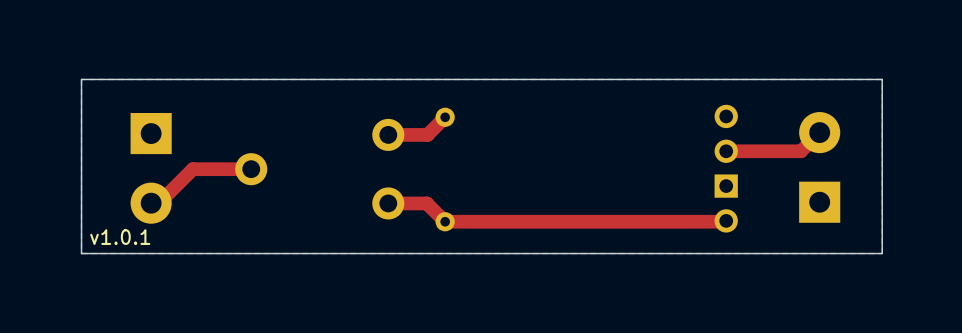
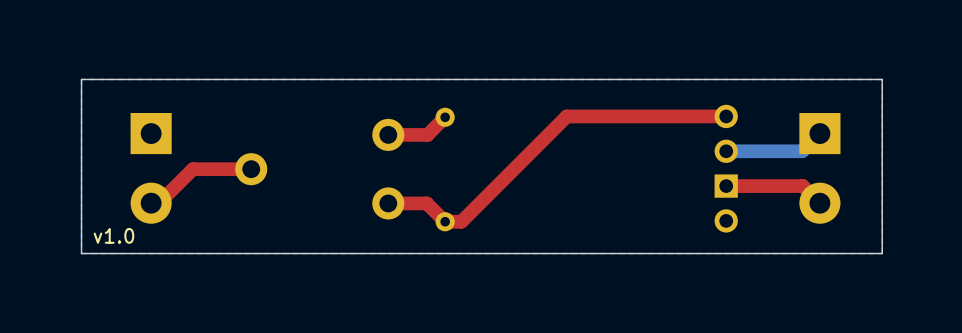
top track: (819, 132) (801, 151) (726, 151) -> none
bottom track: none -> (819, 133) (802, 151) (726, 151)
part rotation: 0° (819, 167) -> 180° (819, 168)
top track: none -> (726, 186) (802, 186) (819, 203)
top track: (726, 220) (461, 221) -> (726, 116) (566, 116) (461, 221)
text: v1.0.1 (120, 237) -> v1.0 (113, 235)

